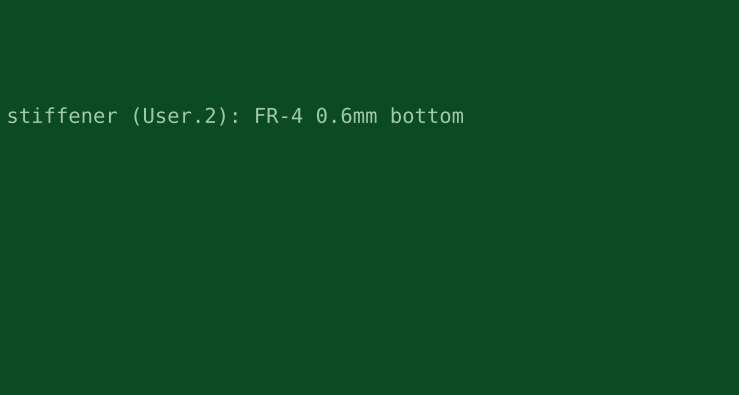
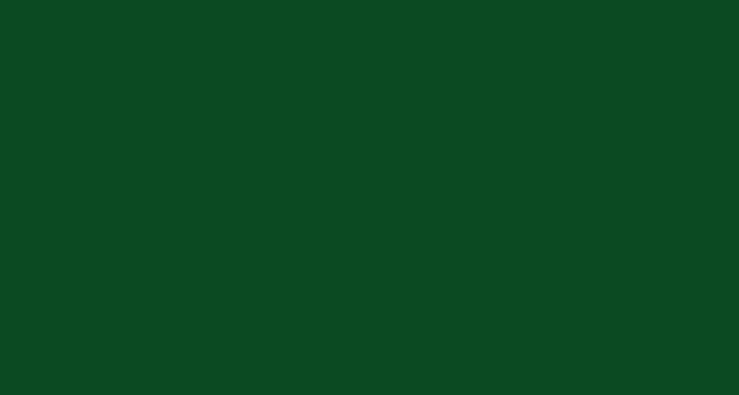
text: stiffener (User.2): FR-4 0.6mm bottom (235, 116) -> none

